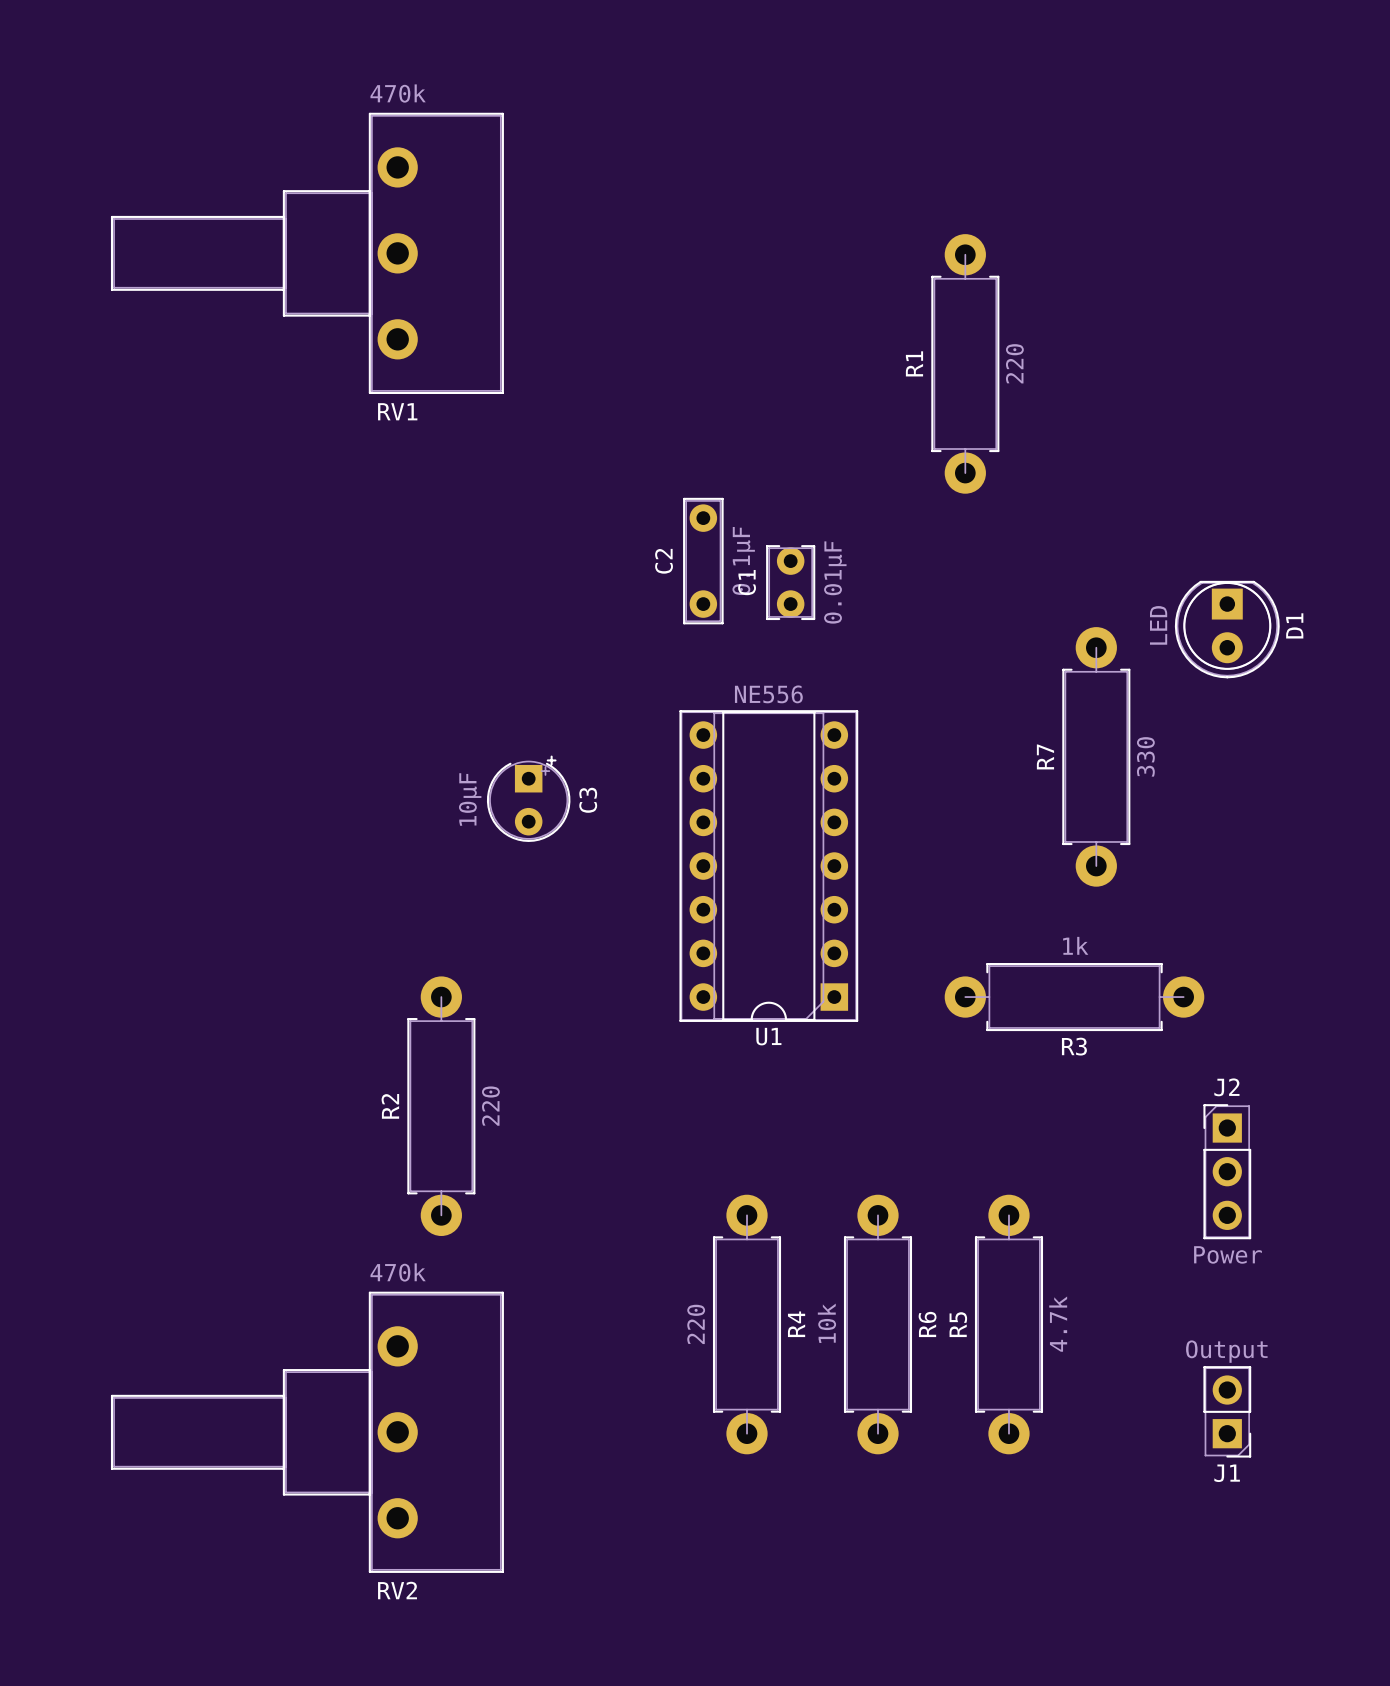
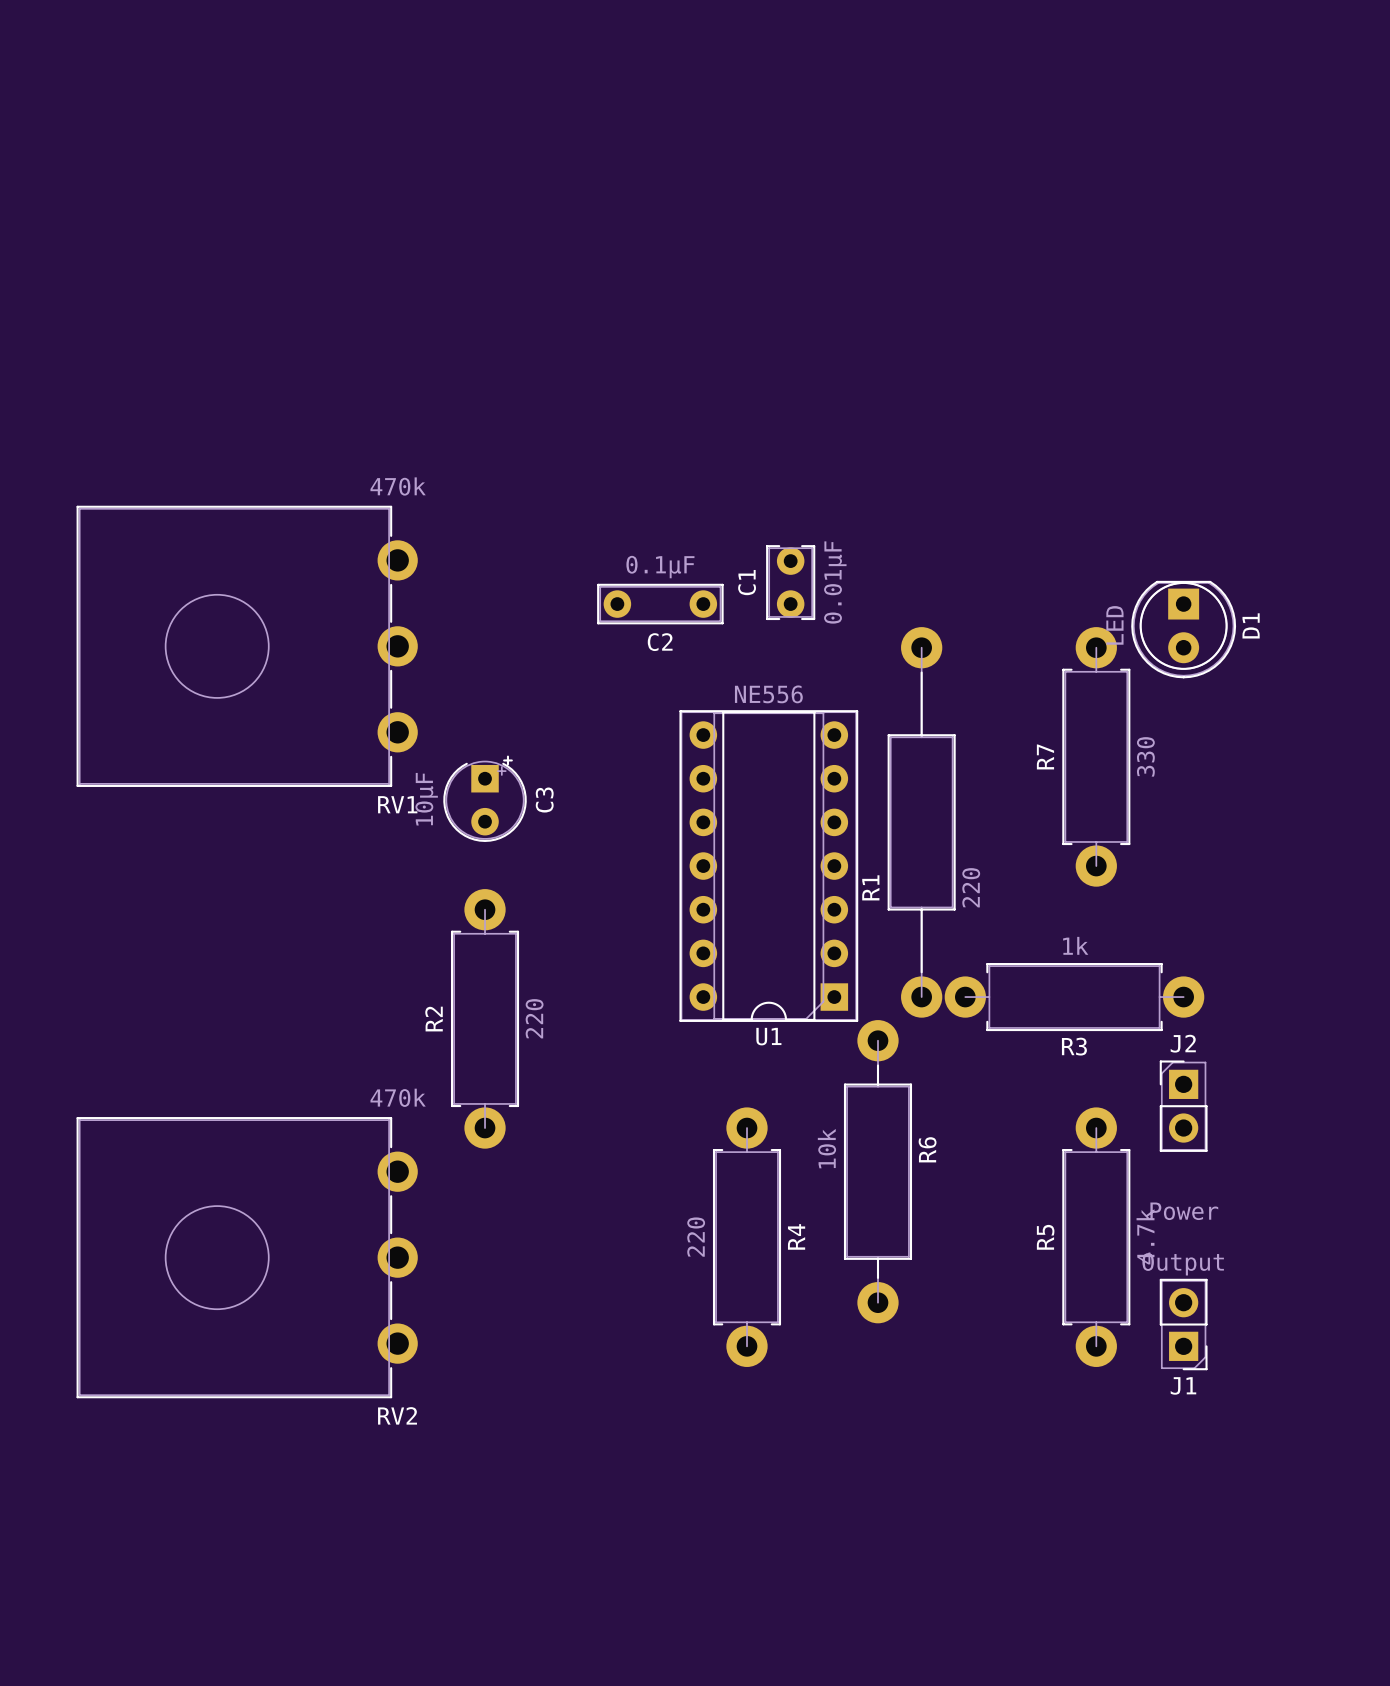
RV1 value position: 470k (398, 93) -> 470k (398, 486)
RV1 footprint: [110, 112, 504, 394] -> [76, 505, 418, 787]
R1 footprint: [931, 234, 1000, 494] -> [887, 627, 956, 1018]
R1 name position: R1 (914, 363) -> R1 (870, 887)
R1 value position: 220 (1014, 363) -> 220 (971, 887)
RV1 name position: RV1 (397, 411) -> RV1 (397, 804)
C2 name position: C2 (664, 561) -> C2 (660, 642)
C2 rotation: 0° (703, 561) -> 90° clockwise (660, 604)
C2 value position: 0.1µF (743, 561) -> 0.1µF (660, 567)
D1 position: (1227, 629) -> (1183, 629)
C3 position: (528, 798) -> (485, 798)
J2 footprint: [1203, 1104, 1252, 1240] -> [1159, 1060, 1208, 1152]
R2 position: (441, 1106) -> (485, 1018)
R6 footprint: [843, 1194, 913, 1455] -> [843, 1020, 913, 1324]
RV2 value position: 470k (398, 1272) -> 470k (398, 1097)
RV2 footprint: [110, 1291, 504, 1573] -> [76, 1117, 418, 1399]
R4 position: (747, 1324) -> (747, 1237)
R5 position: (1008, 1324) -> (1096, 1237)
J1 position: (1227, 1411) -> (1183, 1324)
RV2 name position: RV2 (397, 1590) -> RV2 (397, 1415)

